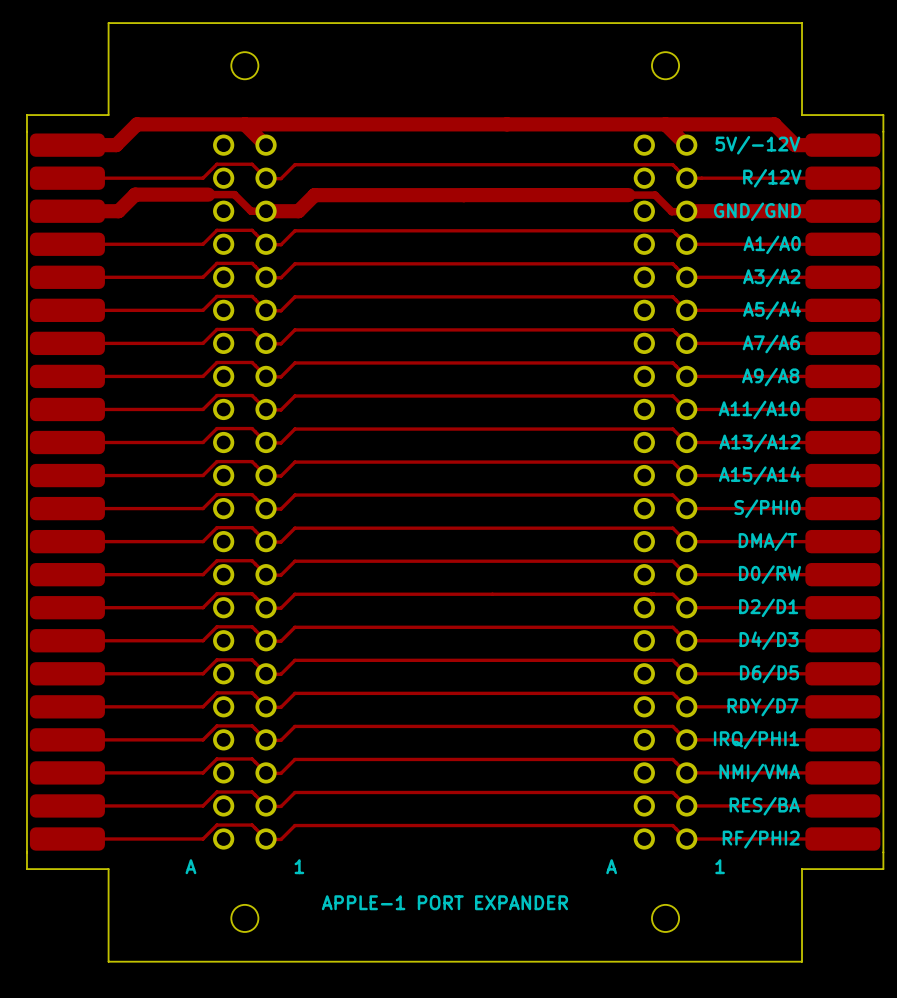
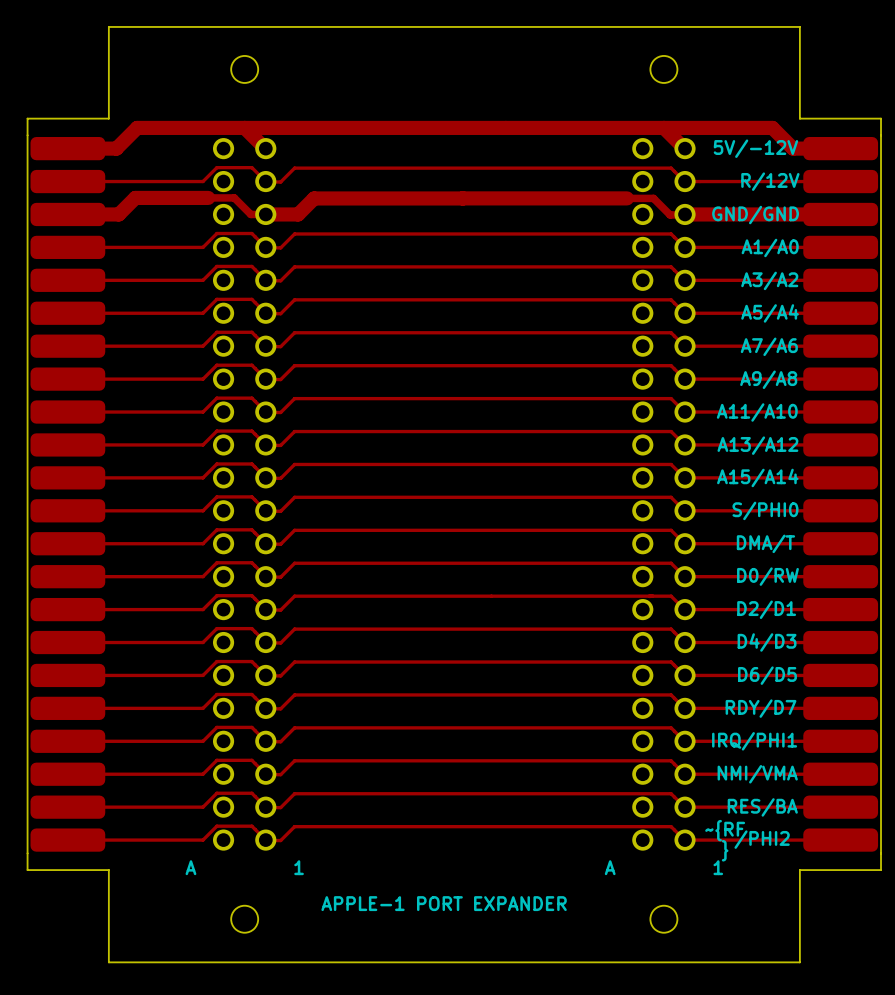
text: none -> ~{RF (725, 830)
text: RF/PHI2 (761, 839) -> /PHI2 (762, 839)
text: none -> } (725, 850)

